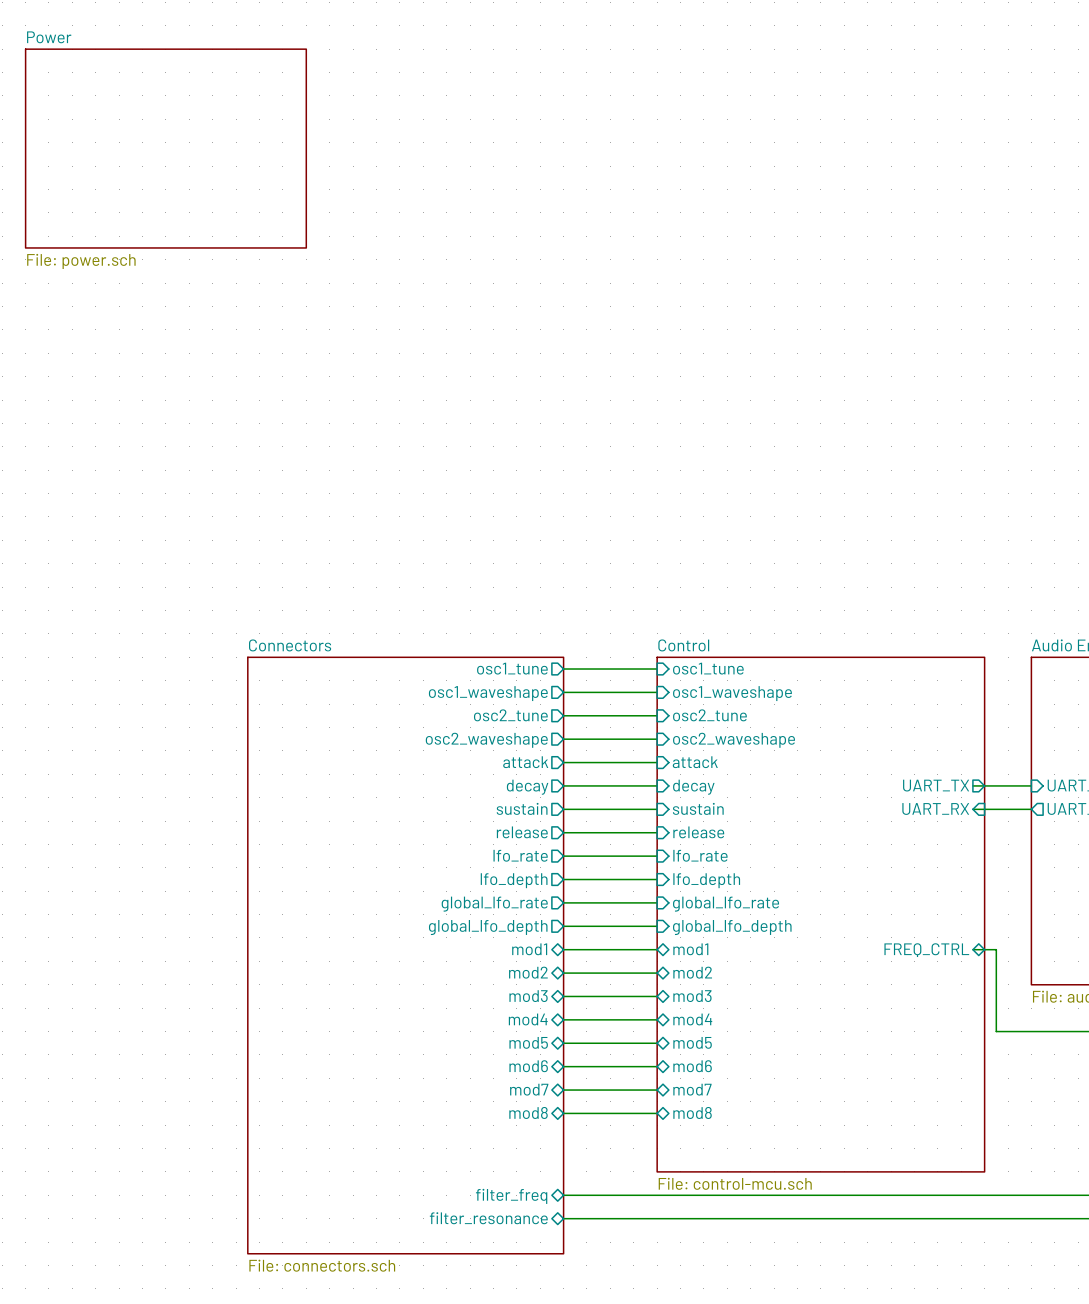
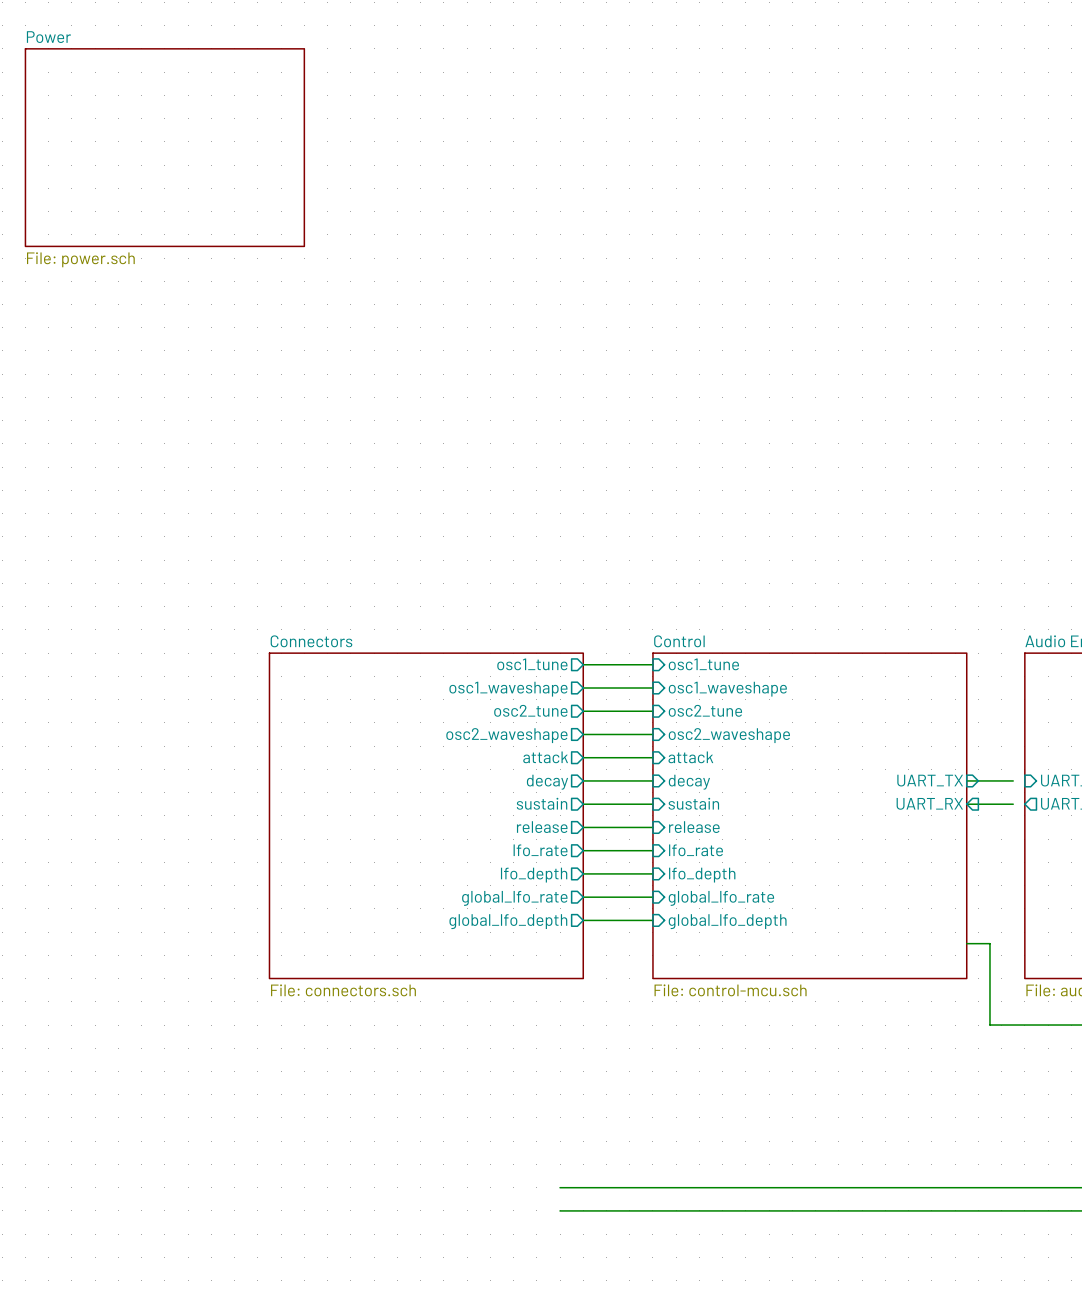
sheet pin position: osc1_tune (512, 668) -> osc1_tune (532, 664)
wire: (563, 669) (586, 669) -> none
wire: (563, 692) (586, 692) -> none
sheet pin position: osc1_waveshape (488, 693) -> osc1_waveshape (508, 689)
sheet pin position: osc2_tune (510, 715) -> osc2_tune (530, 710)
wire: (563, 715) (586, 715) -> none
wire: (563, 739) (586, 739) -> none
sheet pin position: osc2_waveshape (486, 740) -> osc2_waveshape (506, 735)
sheet pin position: attack (525, 762) -> attack (545, 757)
wire: (563, 762) (586, 762) -> none
wire: (563, 785) (586, 785) -> none
wire: (1019, 785) (1031, 785) -> none
sheet pin position: decay (527, 787) -> decay (547, 782)
sheet pin position: sustain (522, 808) -> sustain (542, 803)
wire: (563, 809) (586, 809) -> none
wire: (1019, 809) (1031, 809) -> none
sheet Connectors: none -> File: connectors.sch (426, 815)
sheet Control: none -> File: control-mcu.sch (809, 815)
sheet pin position: release (522, 832) -> release (542, 827)
wire: (563, 832) (586, 832) -> none
sheet pin position: lfo_rate (520, 855) -> lfo_rate (540, 850)
wire: (563, 856) (586, 856) -> none
wire: (563, 879) (586, 879) -> none
sheet pin position: lfo_depth (514, 880) -> lfo_depth (534, 875)
wire: (563, 902) (586, 902) -> none
sheet pin position: global_lfo_rate (494, 904) -> global_lfo_rate (514, 898)
sheet Control: File: control-mcu.sch (820, 914) -> none
wire: (563, 926) (586, 926) -> none
sheet pin position: global_lfo_depth (488, 927) -> global_lfo_depth (508, 921)
sheet pin: mod1 (529, 949) -> none
wire: (563, 949) (657, 949) -> none
sheet pin: mod1 (690, 949) -> none
sheet pin: FREQ_CTRL (926, 950) -> none
sheet Connectors: File: connectors.sch (405, 955) -> none
sheet pin: mod2 (528, 972) -> none
sheet pin: mod2 (692, 972) -> none
wire: (563, 973) (657, 973) -> none
sheet pin: mod3 (528, 996) -> none
wire: (563, 996) (657, 996) -> none
sheet pin: mod3 (692, 996) -> none
sheet pin: mod4 (528, 1019) -> none
wire: (563, 1019) (657, 1019) -> none
sheet pin: mod4 (692, 1019) -> none
sheet pin: mod5 (528, 1042) -> none
sheet pin: mod5 (692, 1042) -> none
wire: (563, 1043) (657, 1043) -> none
sheet pin: mod6 (528, 1066) -> none
wire: (563, 1066) (657, 1066) -> none
sheet pin: mod6 (692, 1066) -> none
sheet pin: mod7 (529, 1089) -> none
sheet pin: mod7 (692, 1089) -> none
wire: (563, 1090) (657, 1090) -> none
sheet pin: mod8 (528, 1112) -> none
sheet pin: mod8 (692, 1112) -> none
wire: (563, 1113) (657, 1113) -> none
sheet pin: filter_freq (511, 1196) -> none
sheet pin: filter_resonance (488, 1218) -> none

